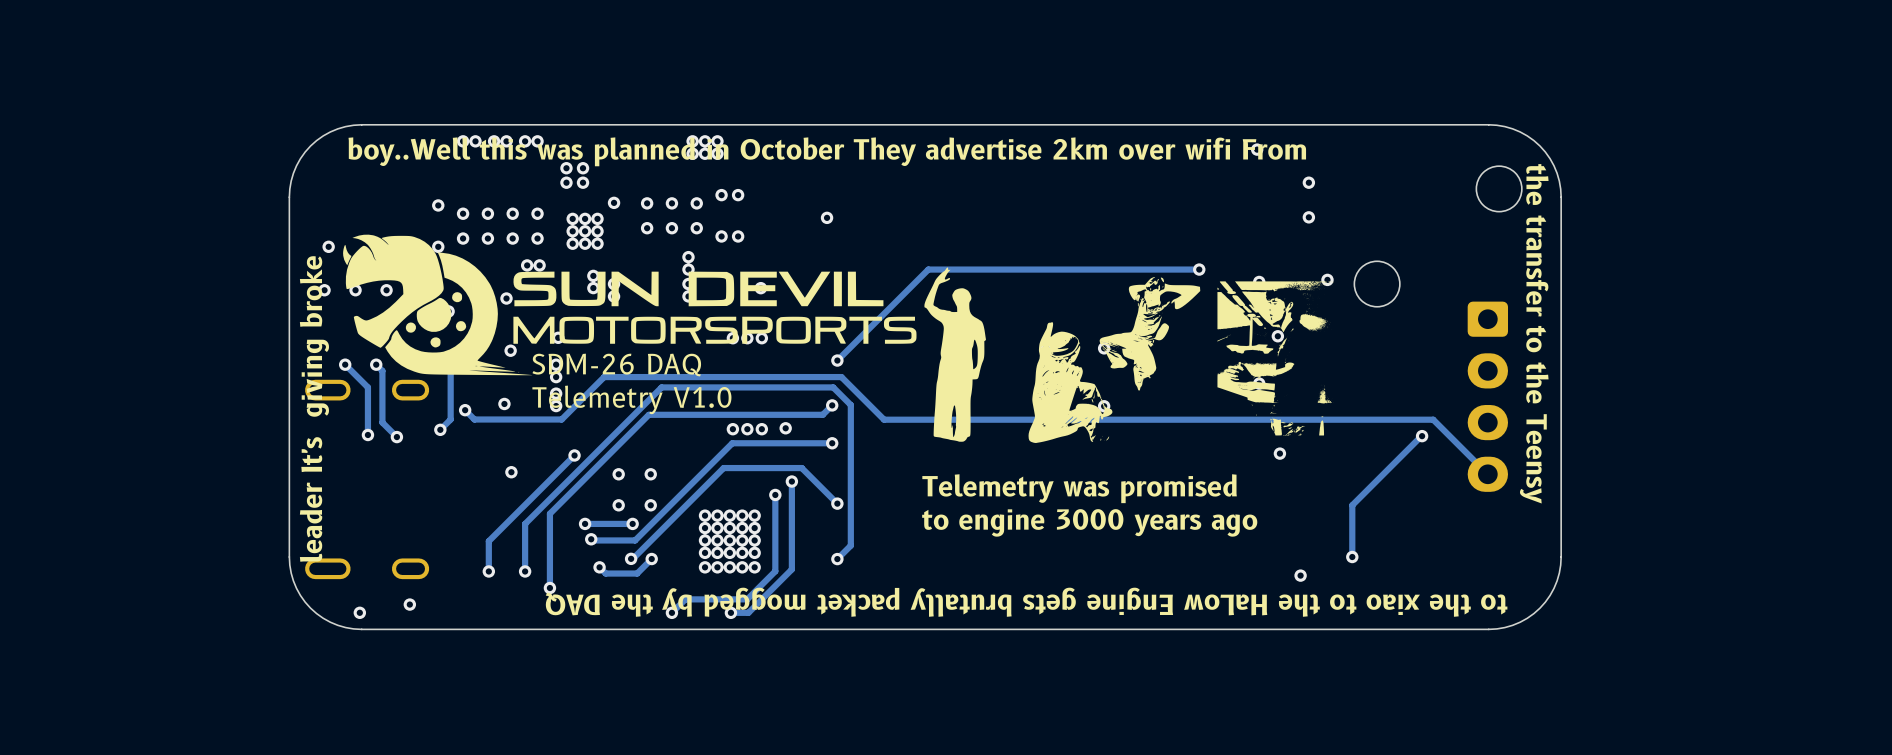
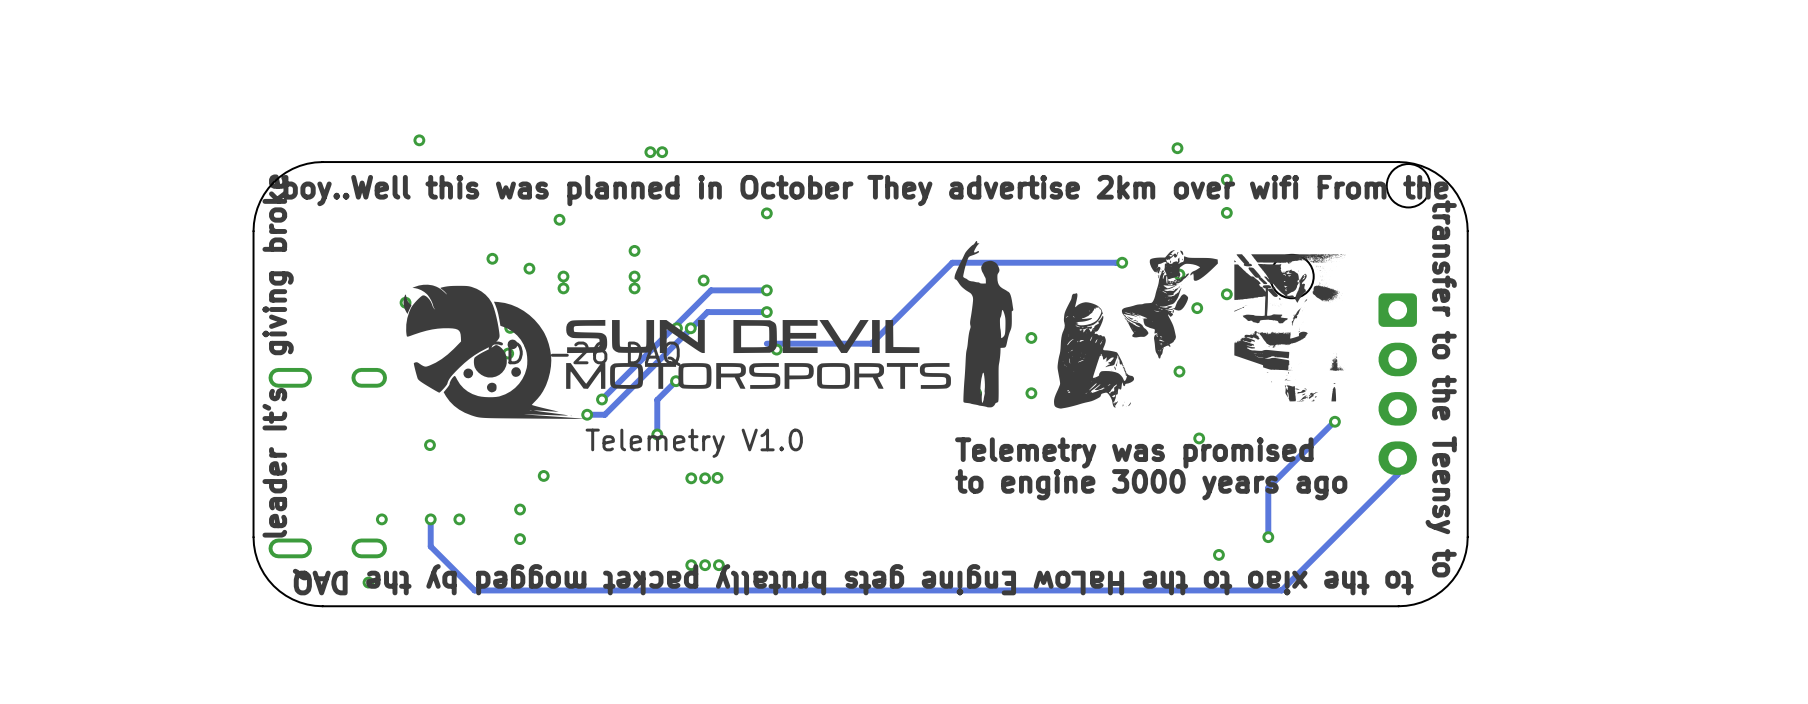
via: (475, 141) -> none
via: (494, 141) -> none
via: (506, 141) -> none
via: (525, 141) -> none
via: (537, 141) -> none
via: (692, 141) -> none
via: (705, 141) -> none
via: (717, 141) -> none
text: boy..Well this was planned in October They advertise 2km over wifi From (827, 151) -> boy..Well this was planned in October They advertise 2km over wifi From the (866, 190)
via: (692, 153) -> none
via: (566, 168) -> none
via: (583, 168) -> none
via: (566, 182) -> none
via: (583, 182) -> none
via: (721, 195) -> none
via: (738, 195) -> none
via: (614, 202) -> none
via: (647, 203) -> none
via: (671, 203) -> none
via: (696, 203) -> none
via: (438, 205) -> none
via: (463, 213) -> none
via: (487, 213) -> none
via: (512, 213) -> none
via: (537, 213) -> none
via: (572, 218) -> none
via: (585, 218) -> none
via: (597, 218) -> none
via: none -> (559, 219)
via: (647, 228) -> none
via: (671, 228) -> none
via: (696, 228) -> none
via: (572, 231) -> none
via: (585, 231) -> none
via: (597, 231) -> none
via: (721, 236) -> none
via: (738, 236) -> none
board edge: (1561, 236) (1560, 189) (1557, 173) (1550, 158) (1539, 146) (1520, 131) (1504, 126) (1488, 124) (353, 125) (337, 128) (323, 135) (310, 146) (300, 158) (293, 173) (289, 189) (289, 236) -> (1467, 231) (1465, 215) (1460, 201) (1447, 182) (1435, 172) (1421, 165) (1398, 162) (314, 162) (292, 168) (279, 177) (268, 188) (257, 208) (253, 231)
via: (463, 238) -> none
via: (487, 238) -> none
via: (512, 238) -> none
via: (537, 238) -> none
via: (572, 243) -> none
via: (585, 243) -> none
via: (597, 243) -> none
via: (328, 246) -> none
via: (438, 246) -> none
via: (527, 265) -> none
via: (688, 269) -> none
track: (1021, 269) (928, 269) (837, 360) -> (952, 262) (871, 343) (766, 343)
via: none -> (529, 268)
via: (593, 275) -> none
via: (1327, 279) -> none
via: (593, 288) -> none
via: (324, 290) -> none
via: (355, 290) -> none
via: (386, 290) -> none
via: (506, 298) -> none
track: none -> (766, 290) (711, 290) (601, 399)
via: none -> (766, 290)
via: none -> (1226, 294)
drawing position: (629, 304) -> (677, 351)
track: none -> (766, 312) (707, 312) (604, 414) (587, 414)
via: none -> (766, 312)
text: the transfer to the Teensy (1534, 333) -> transfer to the Teensy to (1441, 388)
via position: (1277, 336) -> (1197, 308)
via: (761, 338) -> none
track: (479, 343) (450, 372) (450, 419) (440, 429) -> none
via: (510, 350) -> none
drawing position: (955, 354) -> (983, 324)
drawing position: (1275, 358) -> (1289, 327)
drawing position: (1114, 359) -> (1135, 329)
track: (345, 364) (367, 387) (367, 434) -> none
via: (345, 364) -> none
track: (376, 364) (382, 370) (382, 422) (396, 437) -> none
via: (376, 364) -> none
via: (556, 377) -> none
via: (556, 393) -> none
track: none -> (676, 381) (657, 399) (657, 434)
via: none -> (676, 381)
text position: Telemetry V1.0 (631, 399) -> Telemetry V1.0 (694, 443)
via: (504, 403) -> none
track: (832, 405) (822, 414) (648, 414) (549, 513) (549, 588) -> none
via: (832, 405) -> none
via: (556, 406) -> none
track: (465, 410) (474, 419) (561, 419) (604, 377) (841, 377) (884, 419) (1433, 419) (1487, 474) -> (691, 590) (1281, 590) (1397, 474) (1397, 458)
via: (465, 410) -> none
via: none -> (601, 399)
via: none -> (587, 414)
via: (785, 428) -> none
via: (440, 429) -> none
via: (732, 429) -> none
via: (747, 429) -> none
via: (761, 429) -> none
via: (367, 434) -> none
via: (396, 437) -> none
track: (832, 443) (732, 443) (635, 540) (591, 539) -> none
via: (832, 443) -> none
via: none -> (657, 434)
track: (574, 455) (488, 541) (488, 571) -> none
via: (574, 455) -> none
via: none -> (429, 445)
via: (511, 472) -> none
via: (618, 474) -> none
via: (650, 474) -> none
track: (791, 481) (791, 569) (748, 612) -> none
via: (791, 481) -> none
text position: Telemetry was promised (1079, 488) -> Telemetry was promised (1134, 452)
via: none -> (543, 475)
track: (775, 494) (775, 571) (747, 599) (685, 599) (671, 612) -> none
via: none -> (691, 478)
via: none -> (705, 478)
track: (837, 503) (801, 468) (723, 468) (631, 558) -> none
via: (837, 503) -> none
via: (618, 505) -> none
via: (650, 505) -> none
via: (705, 515) -> none
via: (717, 515) -> none
via: (729, 515) -> none
via: (742, 515) -> none
via: (754, 515) -> none
text position: to engine 3000 years ago (1089, 522) -> to engine 3000 years ago (1151, 484)
track: (585, 523) (632, 524) -> none
via: (585, 523) -> none
via: (632, 523) -> none
via: none -> (520, 509)
via: (705, 528) -> none
via: (717, 528) -> none
via: (729, 528) -> none
via: (742, 528) -> none
via: (754, 528) -> none
via: none -> (381, 519)
track: none -> (430, 519) (430, 546) (474, 590) (675, 590)
via: none -> (430, 519)
via: none -> (459, 519)
via: (591, 539) -> none
via: (705, 540) -> none
via: (717, 540) -> none
via: (729, 540) -> none
via: (742, 540) -> none
via: (754, 540) -> none
via: (705, 552) -> none
via: (717, 552) -> none
via: (729, 552) -> none
via: (742, 552) -> none
via: (754, 552) -> none
via: (631, 558) -> none
via: none -> (520, 539)
track: (651, 559) (637, 573) (605, 573) (599, 567) -> none
via: (651, 559) -> none
track: (837, 559) (850, 545) (850, 405) (833, 387) (661, 387) (525, 523) (525, 571) -> none
via: (837, 559) -> none
via: (599, 567) -> none
via: (705, 567) -> none
via: (717, 567) -> none
via: (729, 567) -> none
via: (742, 567) -> none
via: (754, 567) -> none
via: (488, 571) -> none
via: (525, 571) -> none
via: none -> (691, 565)
via: none -> (705, 565)
via: none -> (718, 565)
via: (549, 588) -> none
via: (359, 612) -> none
via: (671, 612) -> none
via: (730, 612) -> none

